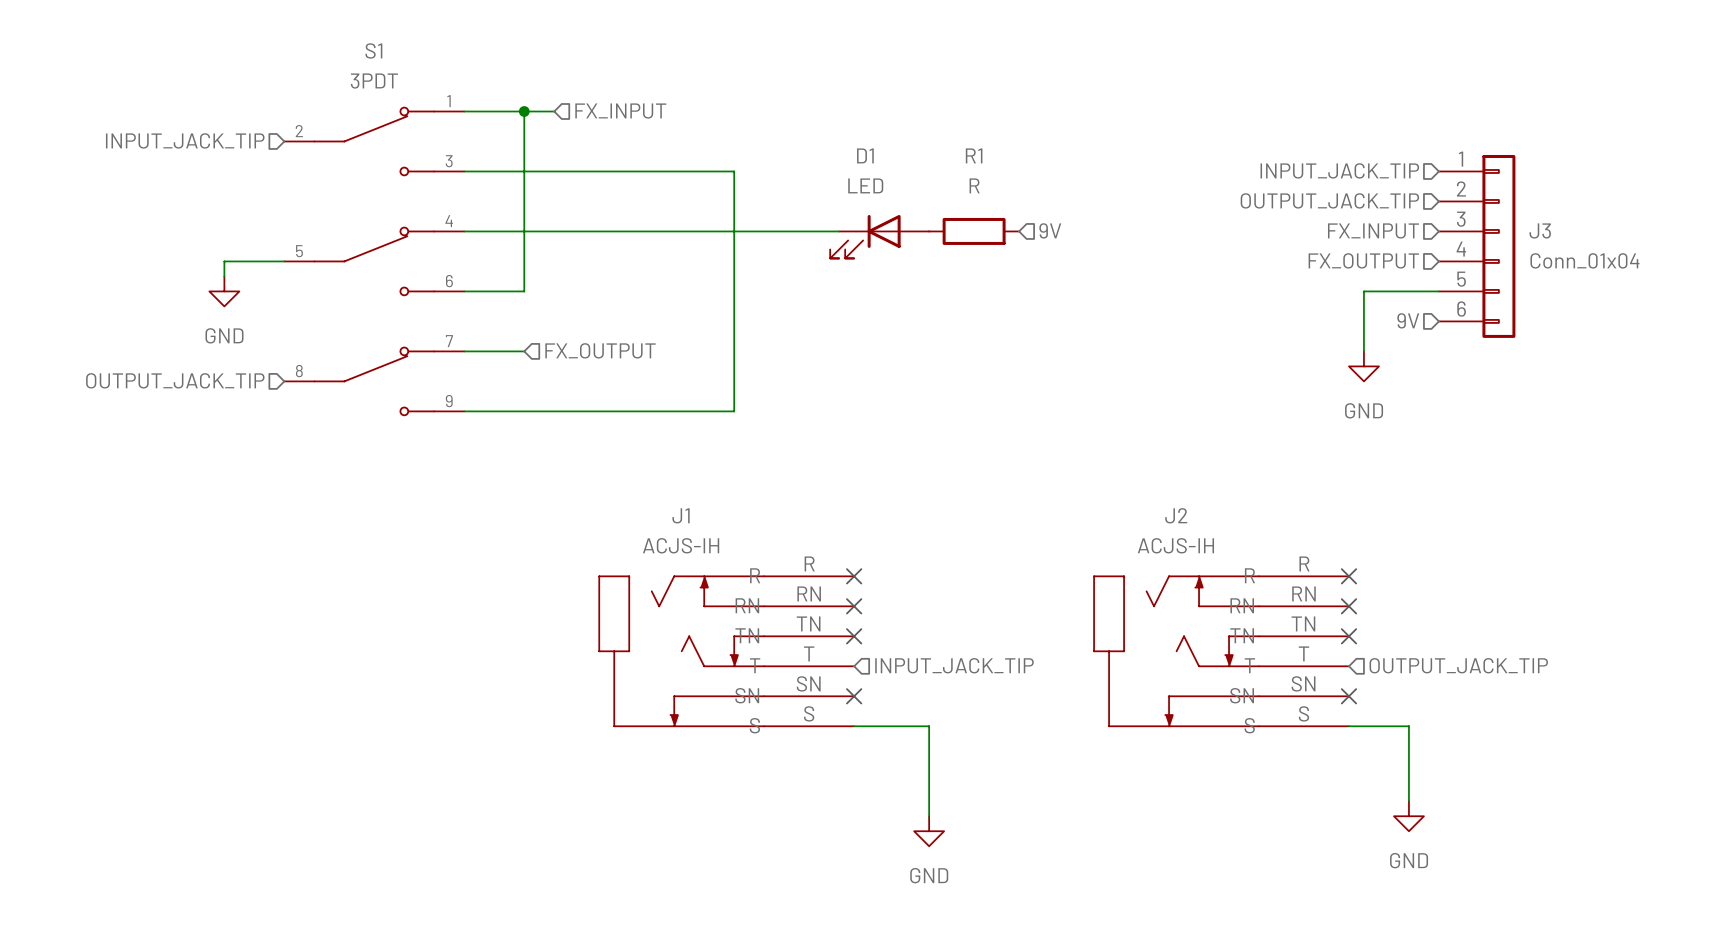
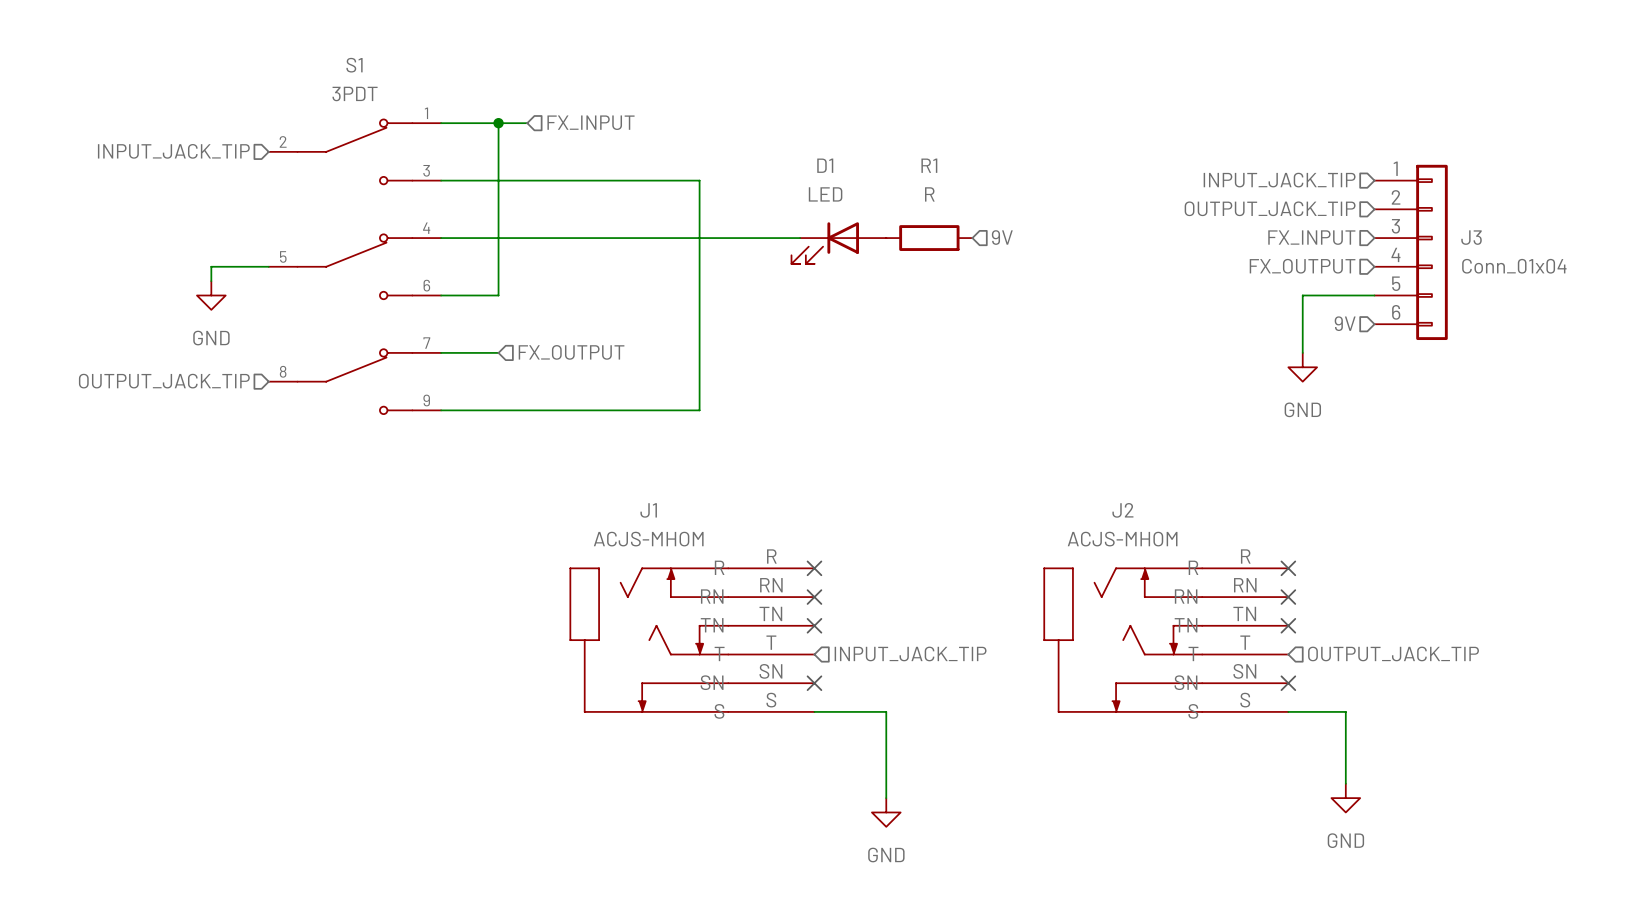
J1 value: ACJS-IH (681, 545) -> ACJS-MHOM (648, 539)
J2 value: ACJS-IH (1175, 545) -> ACJS-MHOM (1122, 539)

